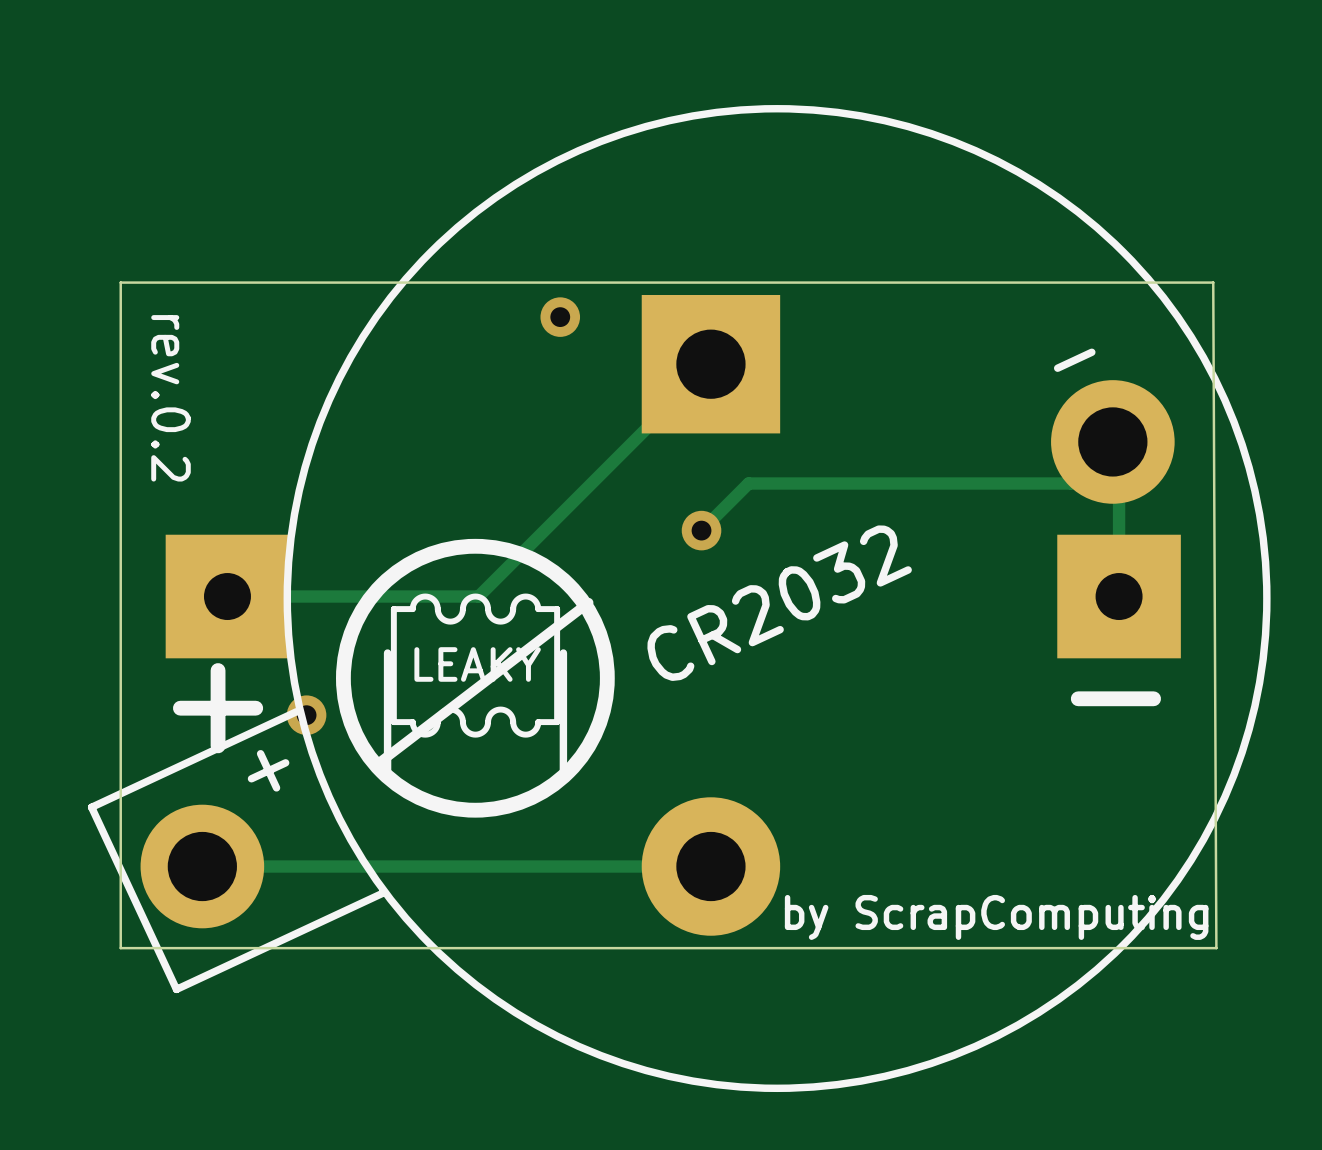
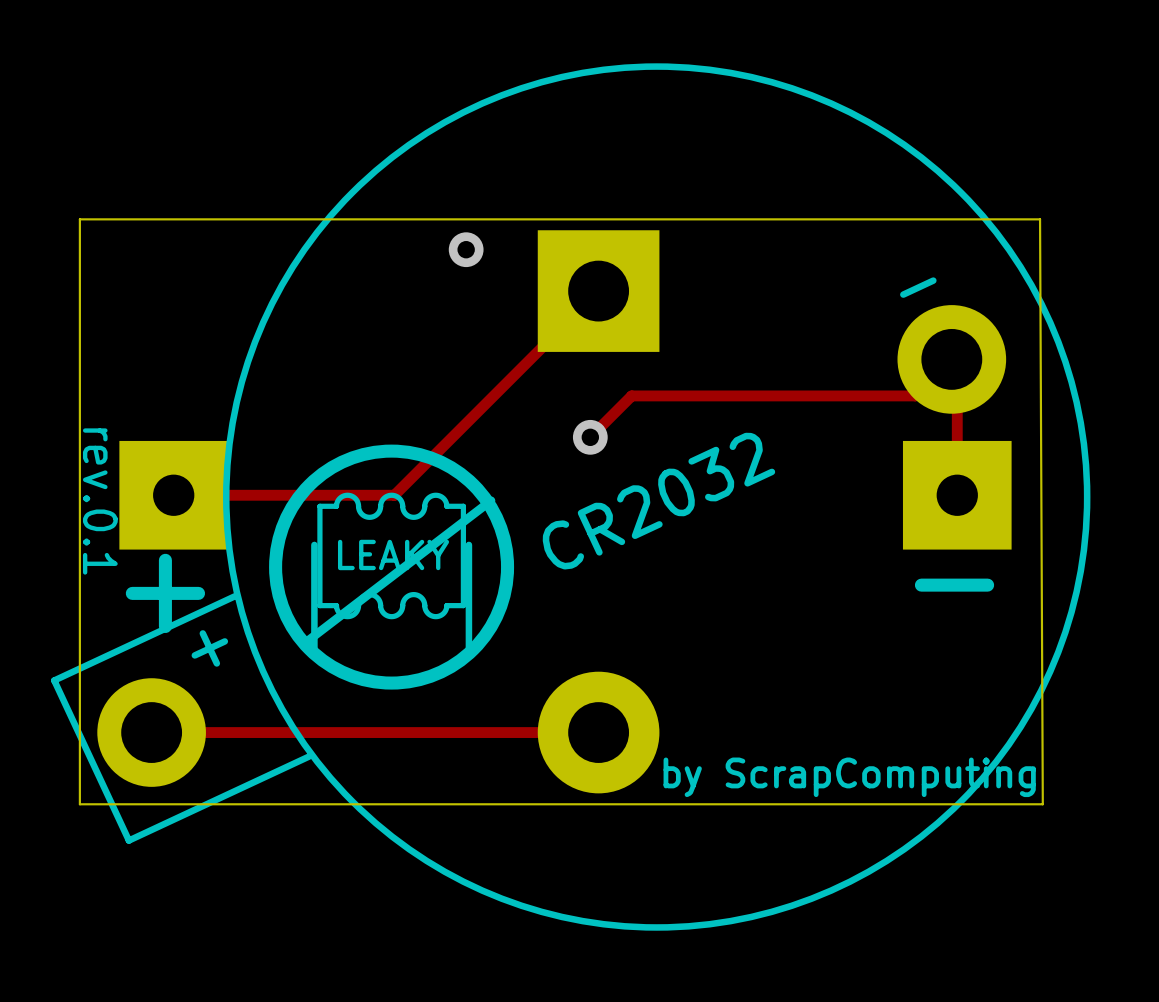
text: rev.0.2 (171, 398) -> rev.0.1 (100, 501)
via: (306, 715) -> none

